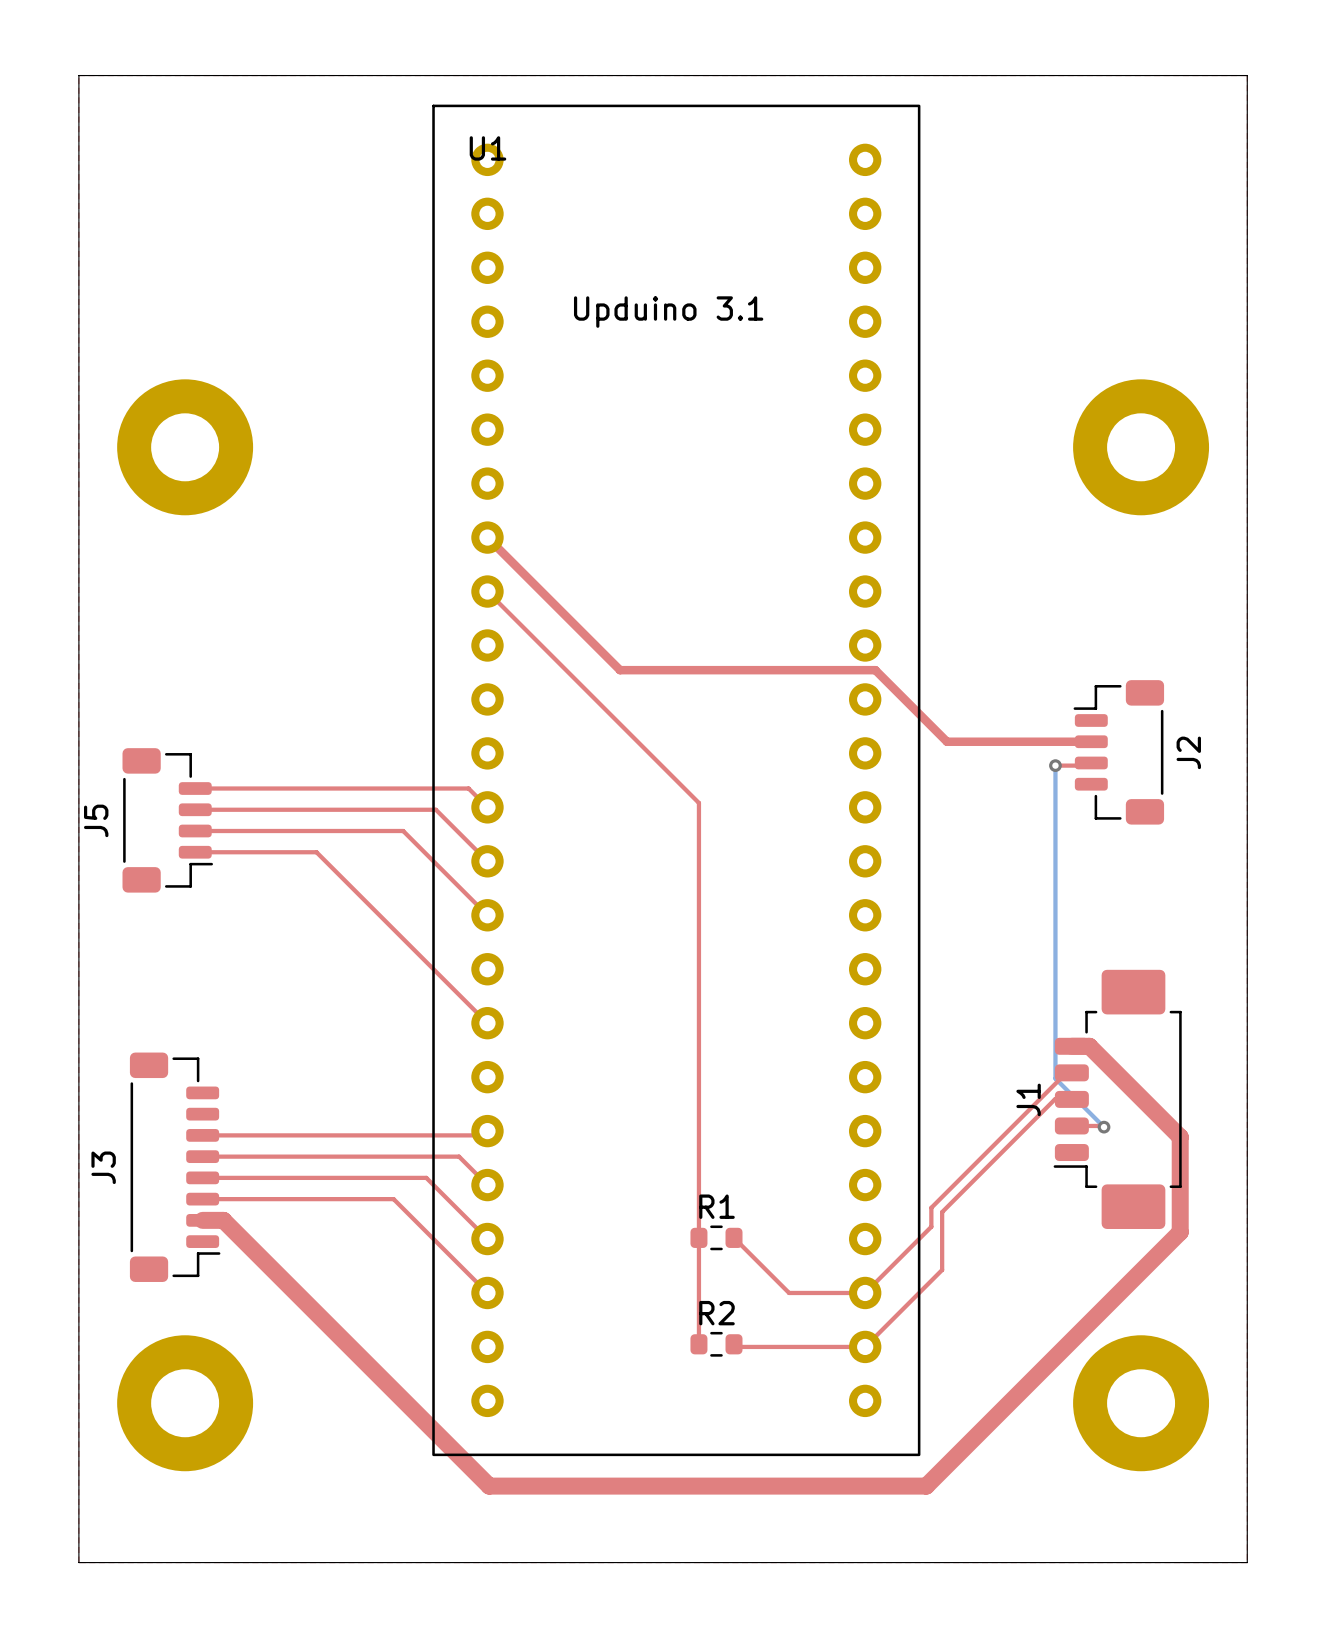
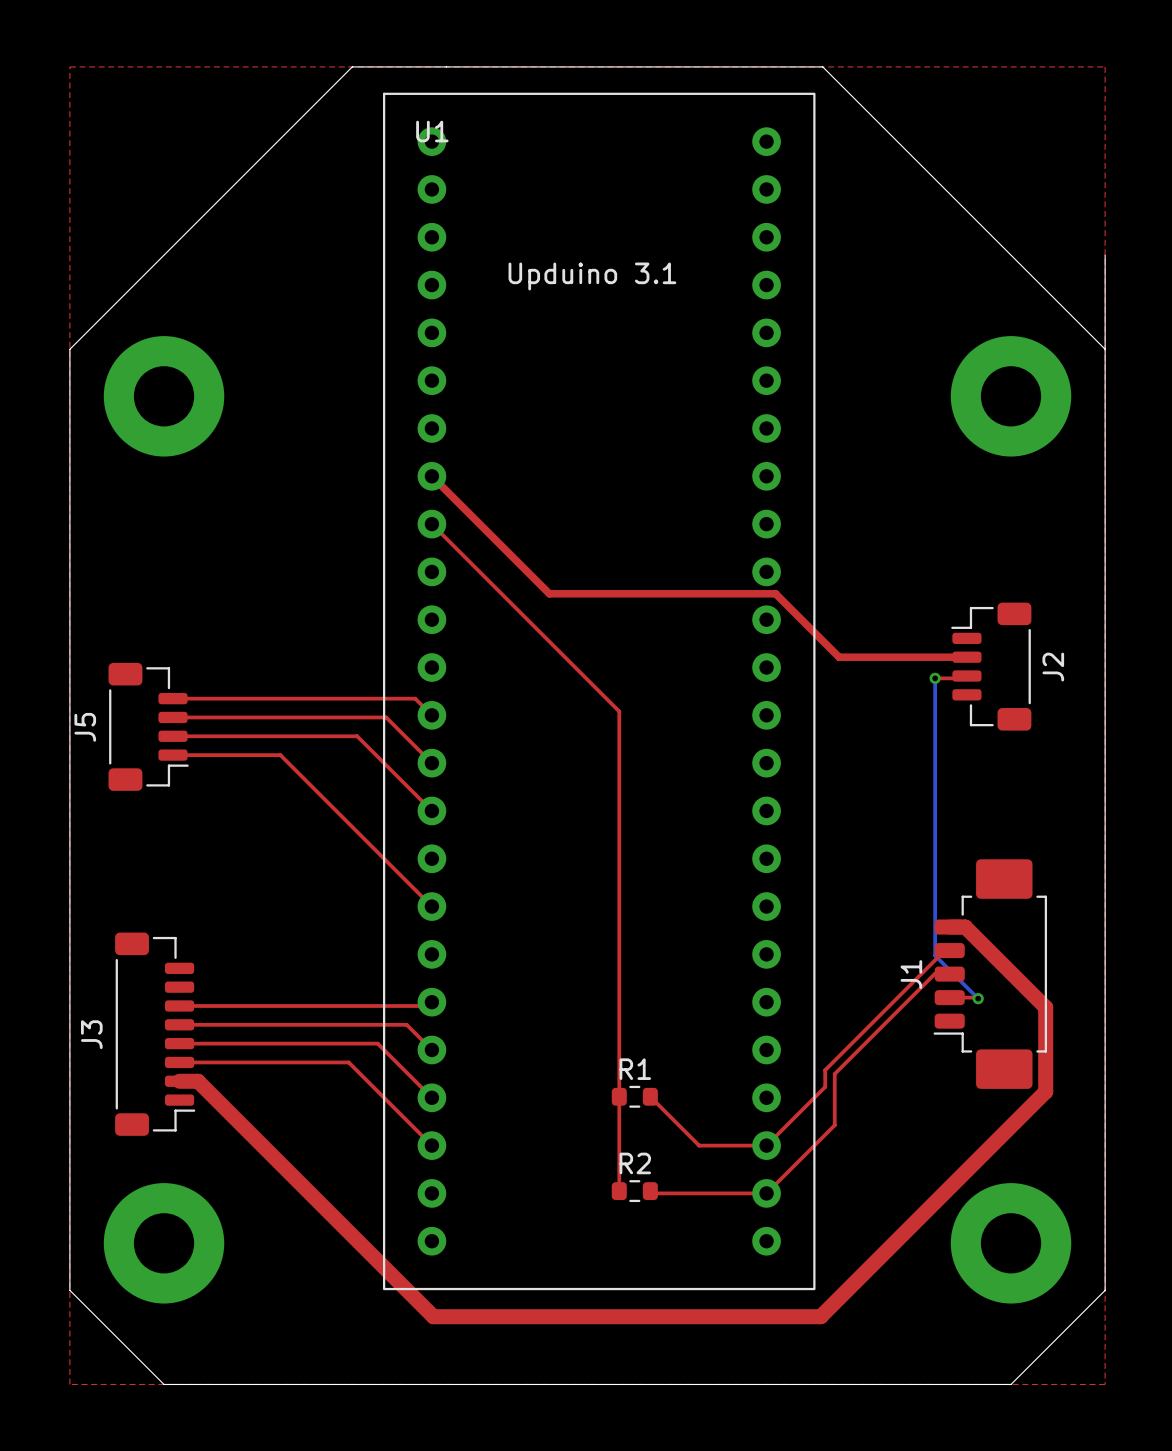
board edge: (397, 75) (78, 75) (78, 394) -> (352, 66) (69, 349)
board edge: (928, 75) (1247, 75) (1247, 287) -> (822, 66) (1105, 349)
board edge: (78, 1456) (78, 1562) (185, 1562) -> (69, 1290) (164, 1384)
board edge: (1247, 1456) (1247, 1562) (1141, 1562) -> (1105, 1290) (1011, 1384)

